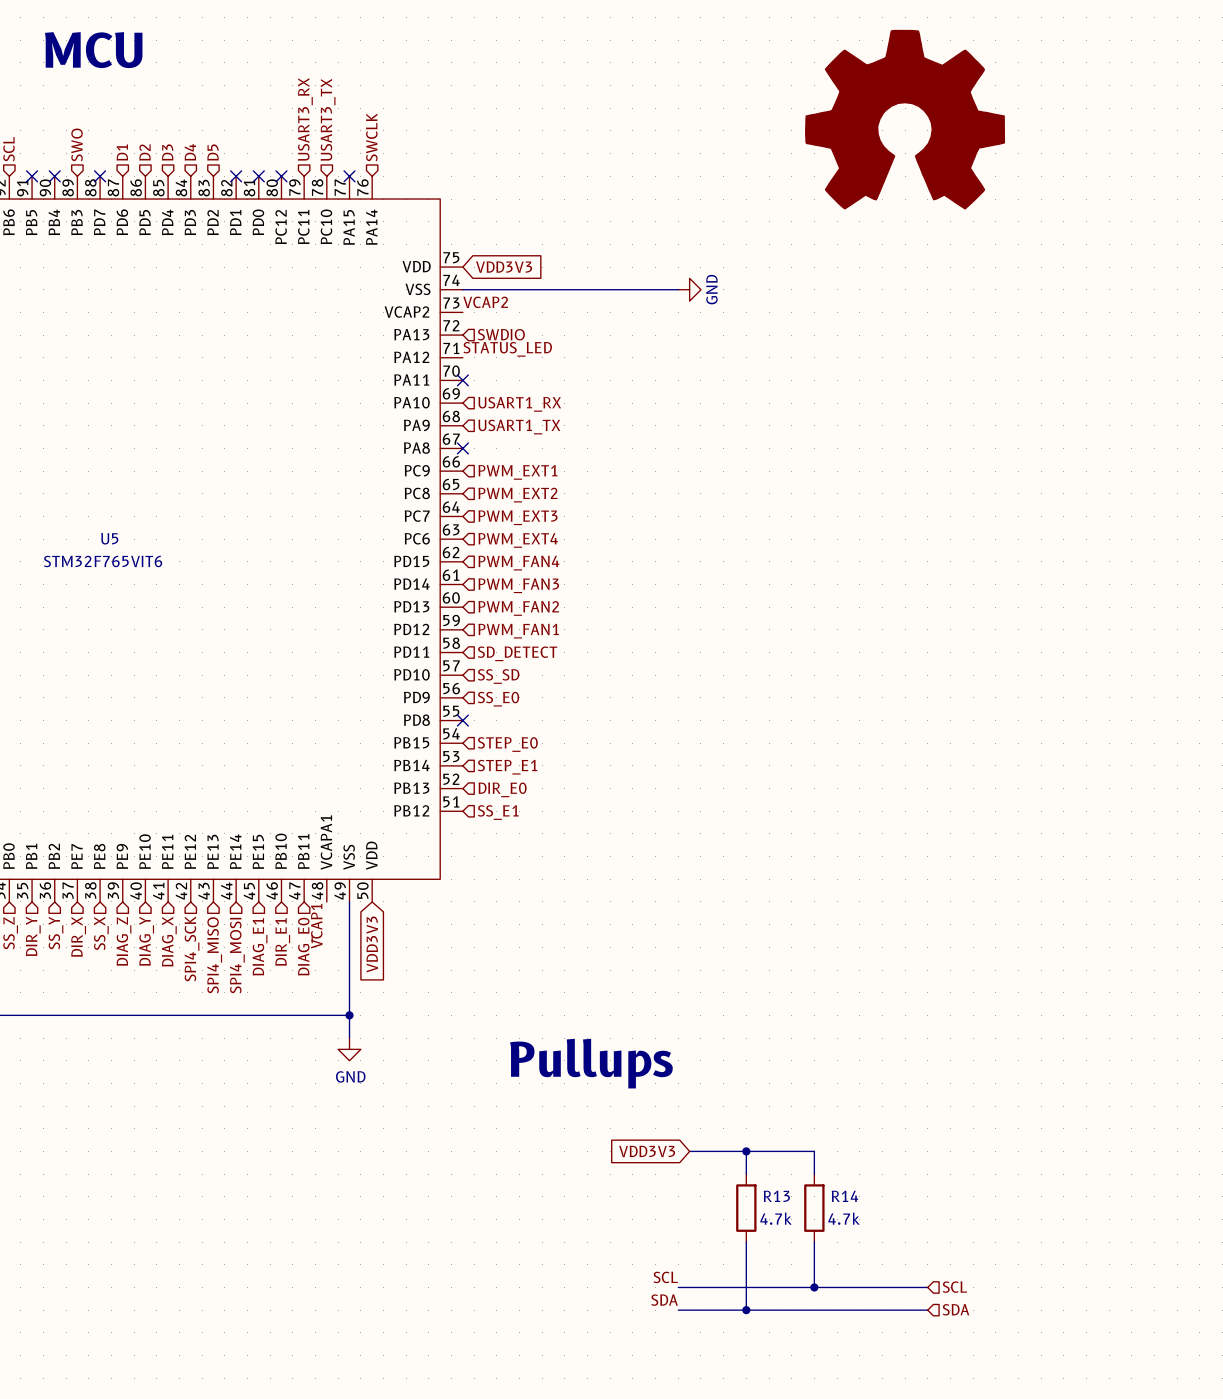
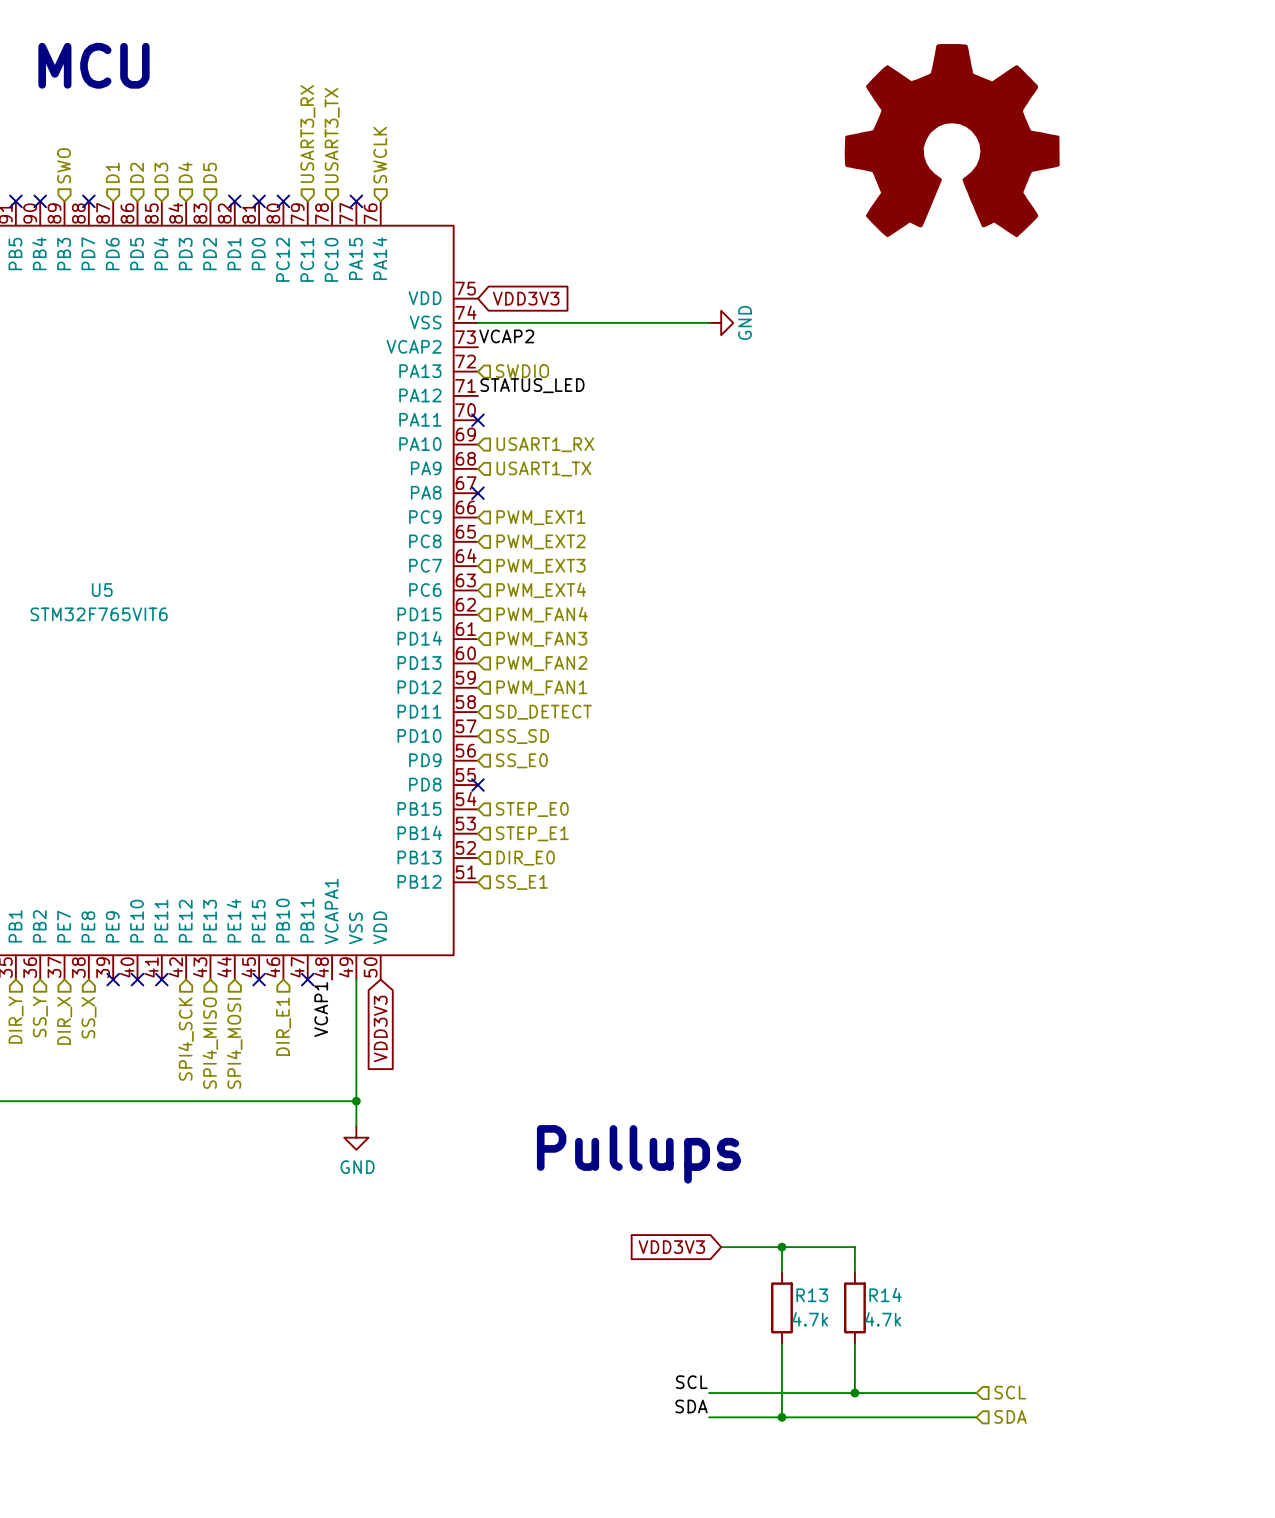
no-connect mark: none -> (113, 979)
no-connect mark: none -> (137, 979)
no-connect mark: none -> (161, 979)
no-connect mark: none -> (259, 979)
no-connect mark: none -> (307, 979)
hierarchical label: DIAG_Z (124, 941) -> none
hierarchical label: DIAG_Y (146, 941) -> none
hierarchical label: DIAG_X (169, 941) -> none
hierarchical label: DIAG_E1 (260, 946) -> none
hierarchical label: DIAG_E0 (305, 946) -> none

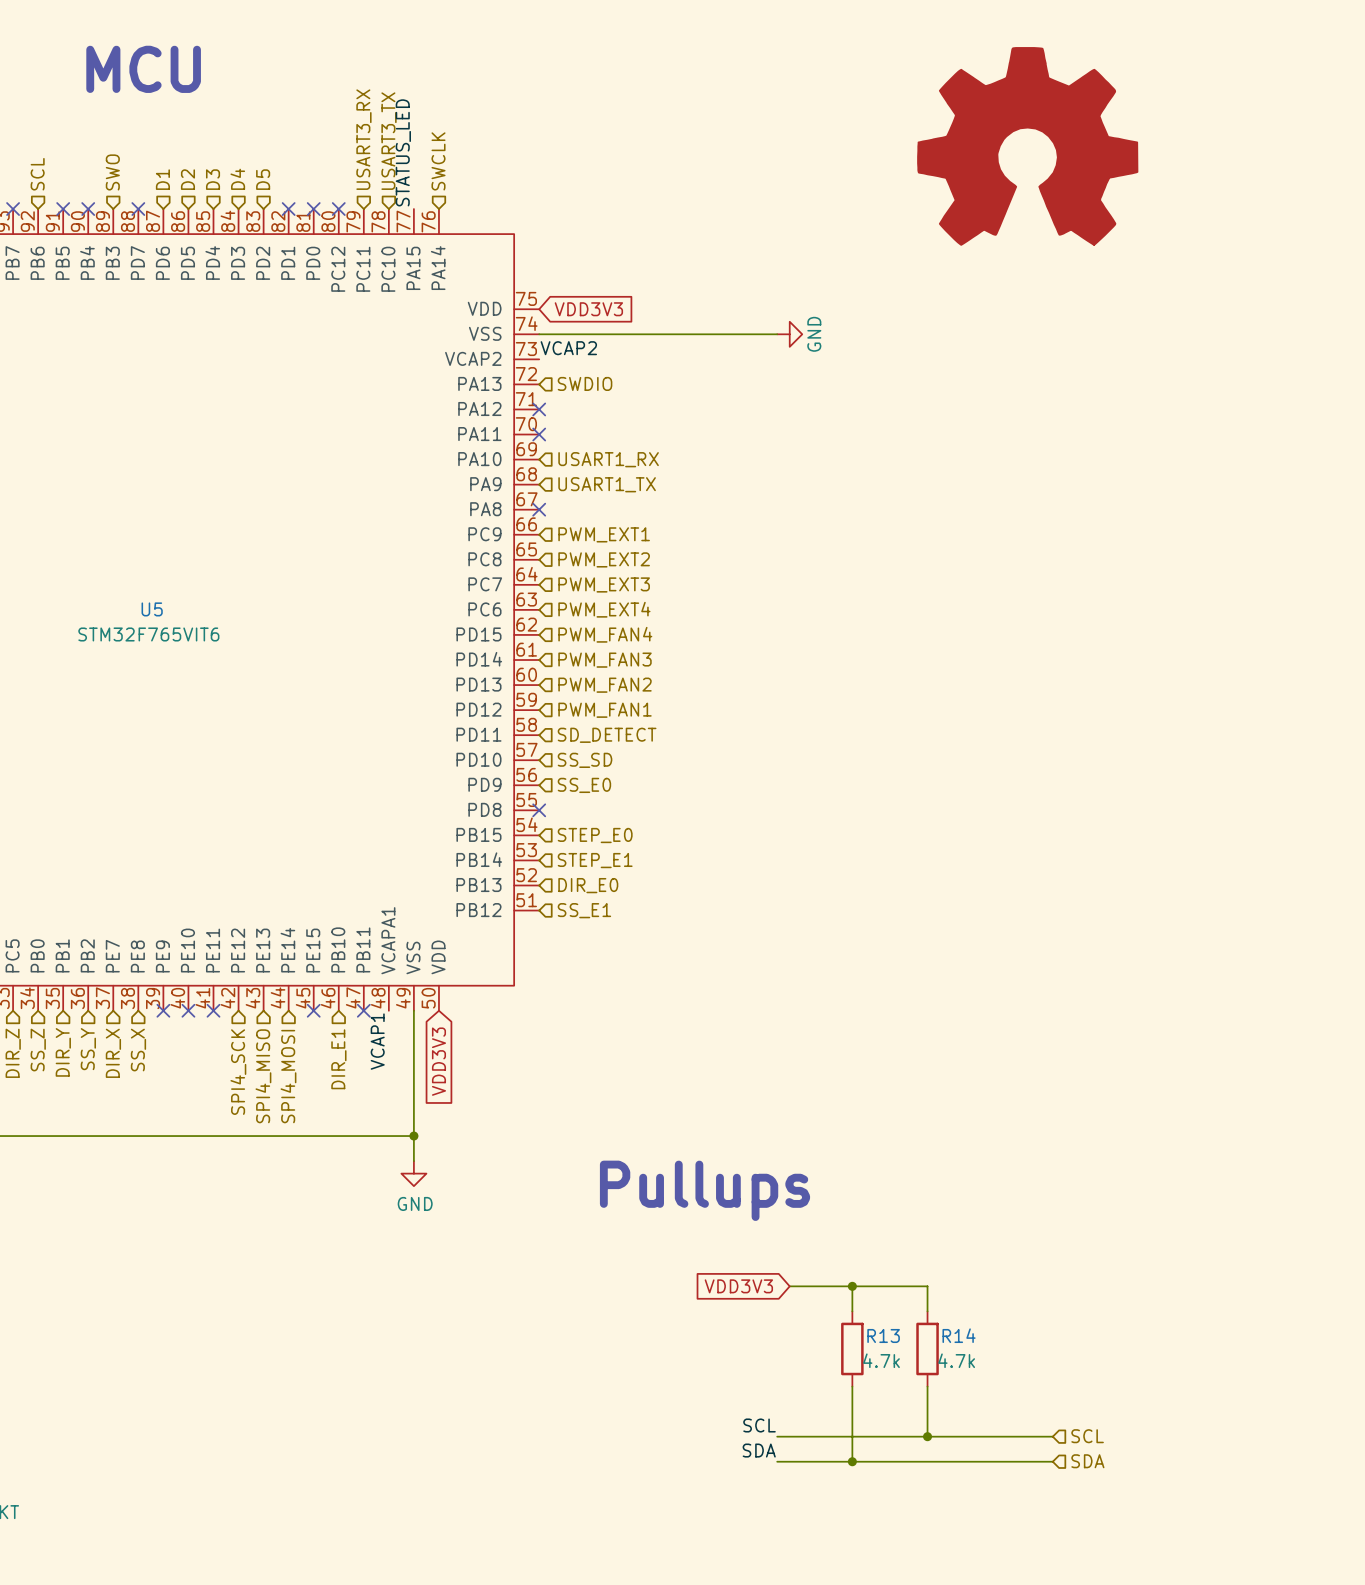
no-connect mark: (356, 201) -> none
label rotation: 0° (532, 385) -> 90° counterclockwise (403, 152)
label position: STATUS_LED (532, 385) -> STATUS_LED (403, 152)
no-connect mark: none -> (539, 409)

